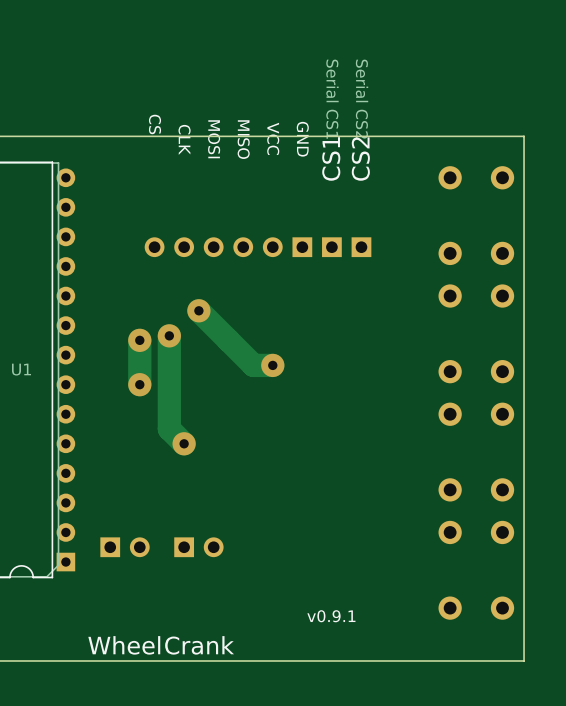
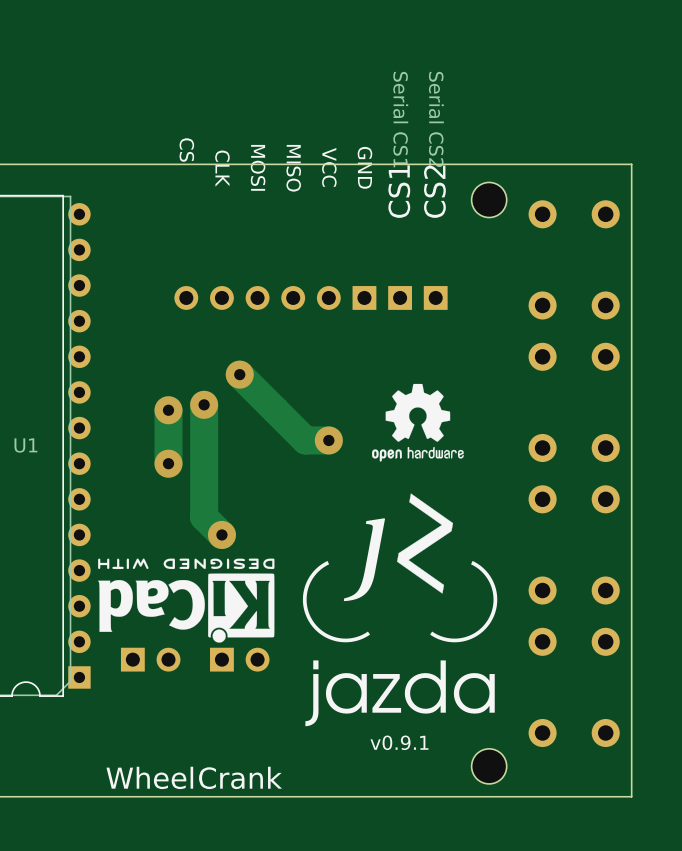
part: none -> (489, 199)
drawing: none -> [302, 383, 498, 727]
drawing: none -> [98, 558, 275, 643]
part: none -> (489, 766)

